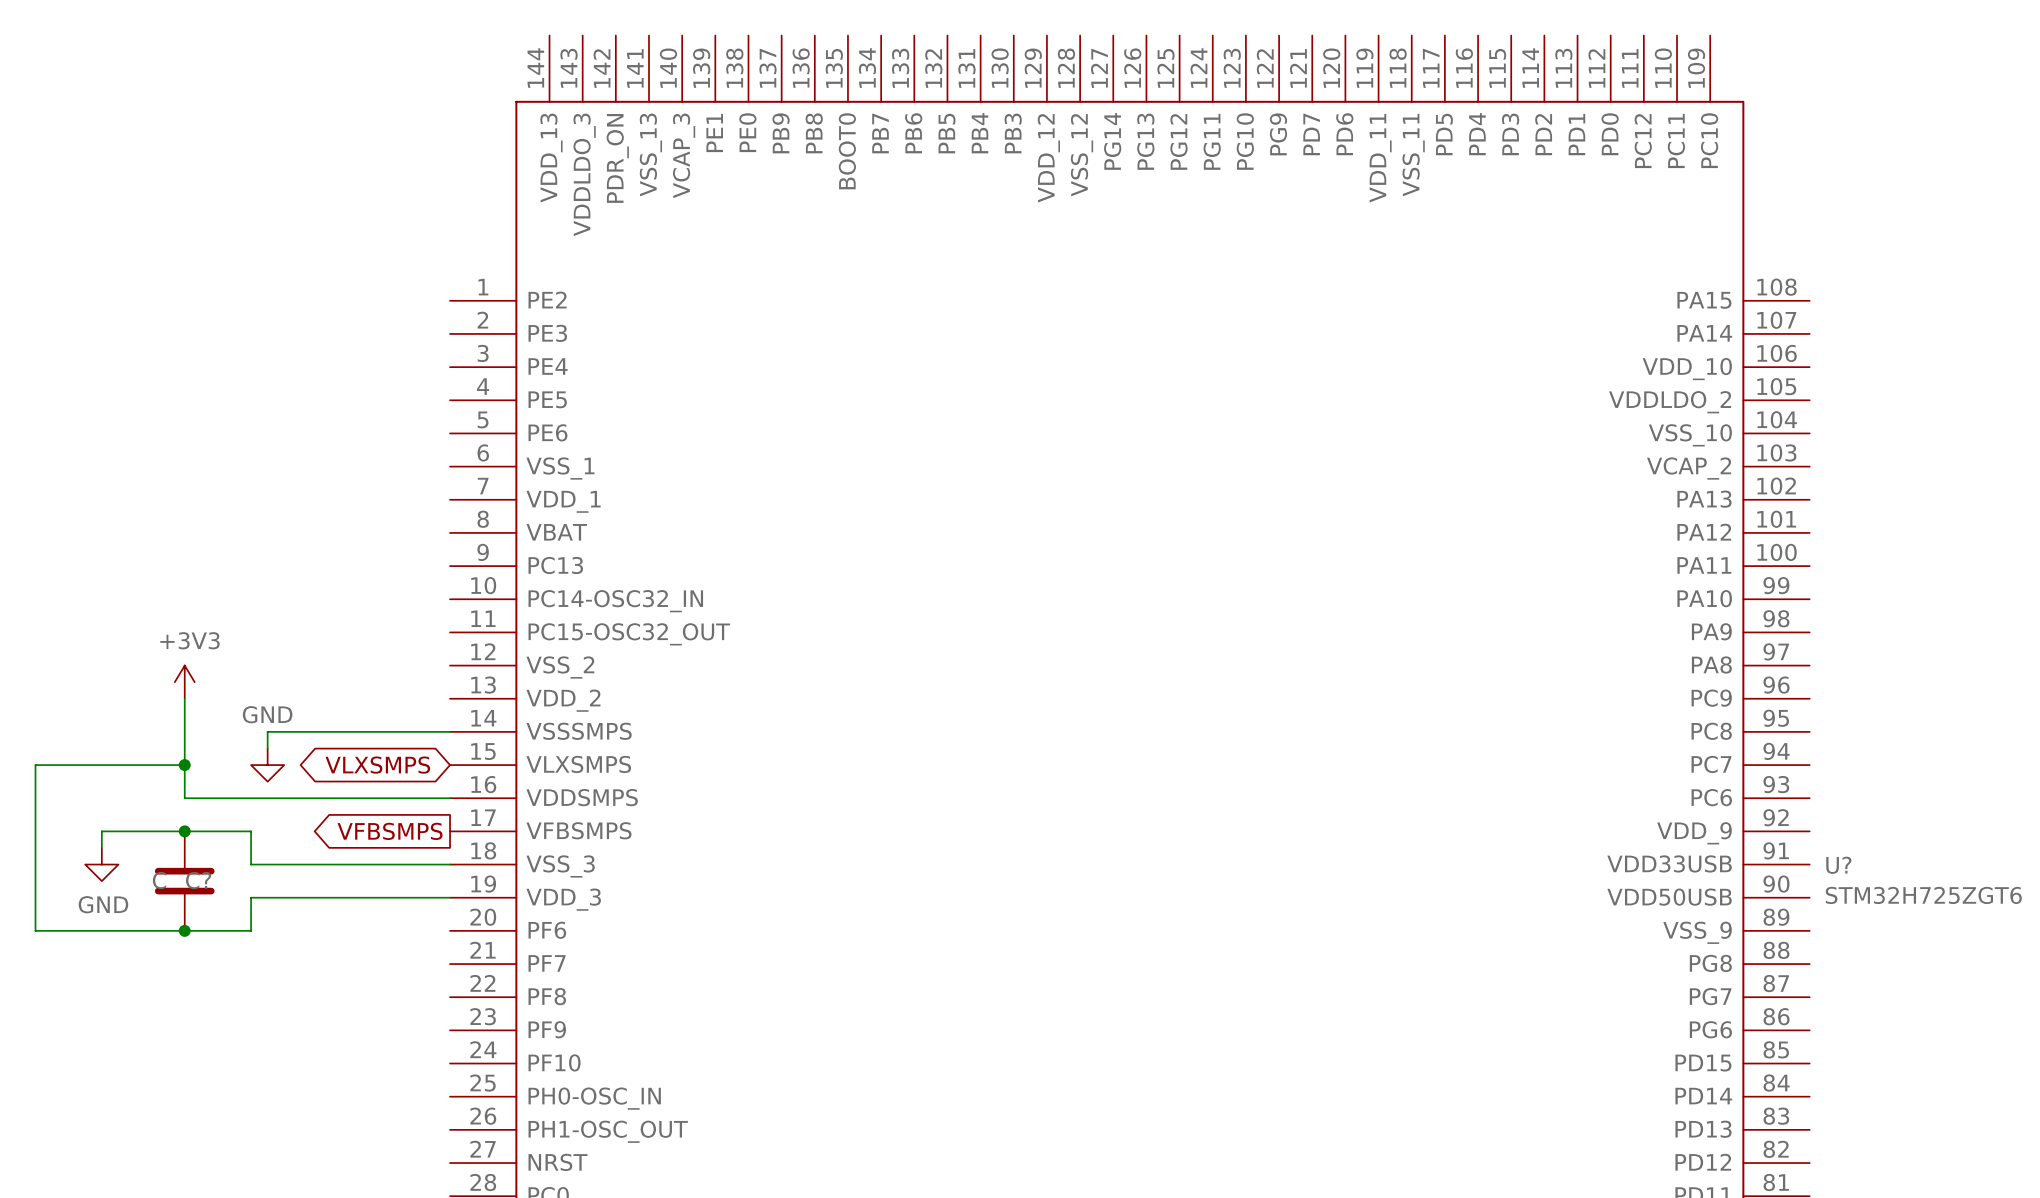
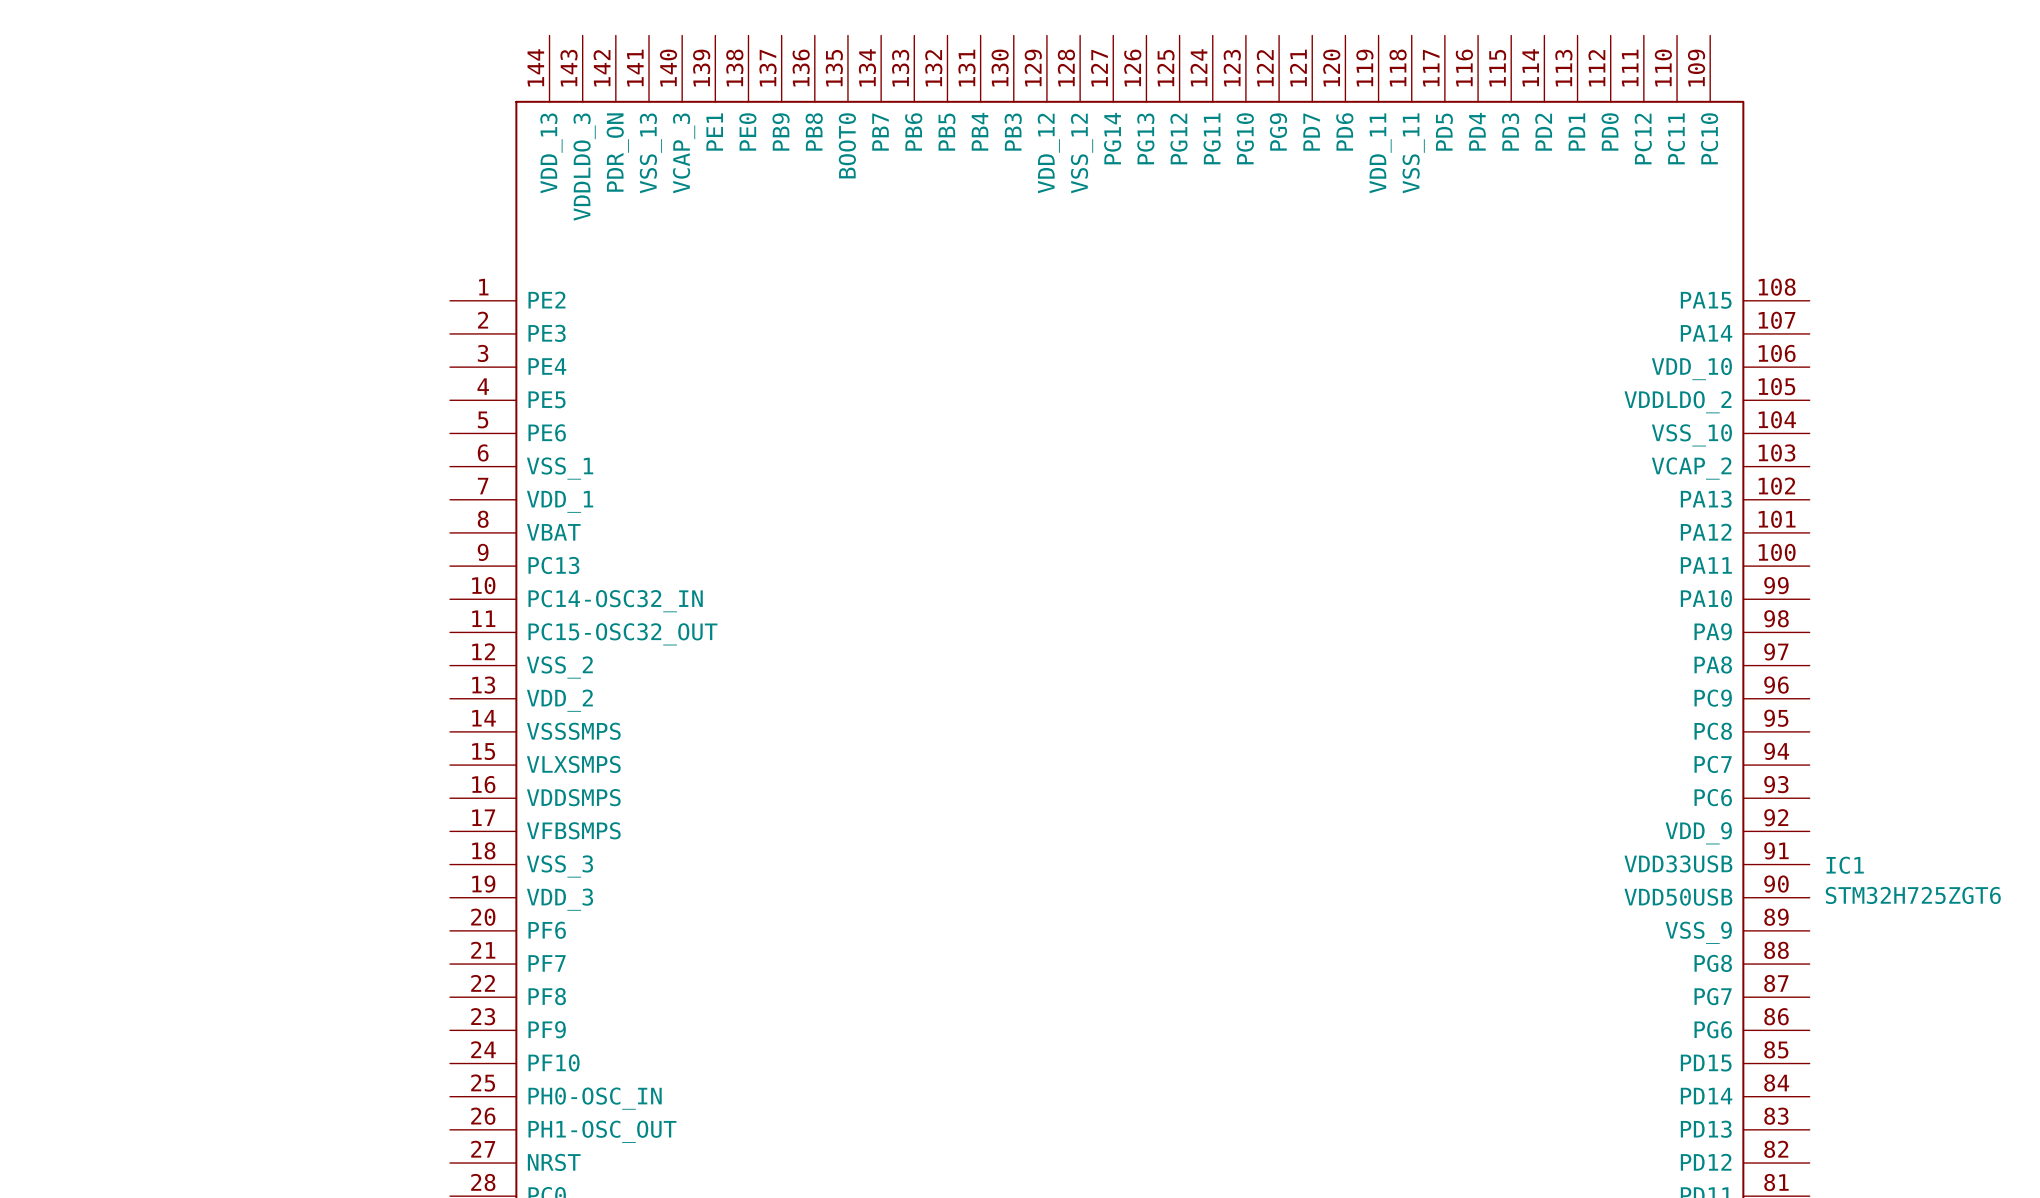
power symbol: +3V3 (184, 682) -> none
wire: (184, 698) (184, 798) (450, 798) -> none
wire: (450, 731) (267, 731) (267, 748) -> none
wire: (184, 765) (35, 765) (35, 930) (251, 930) (251, 897) (450, 897) -> none
junction: (184, 765) -> none
power symbol: GND (267, 765) -> none
global label: VLXSMPS (377, 765) -> none
junction: (184, 831) -> none
global label: VFBSMPS (390, 831) -> none
wire: (101, 847) (101, 831) (251, 831) (251, 864) (450, 864) -> none
power symbol: GND (101, 864) -> none
U? name: U? (1838, 865) -> IC1 (1845, 865)
C?: C (184, 881) -> none
junction: (184, 930) -> none

